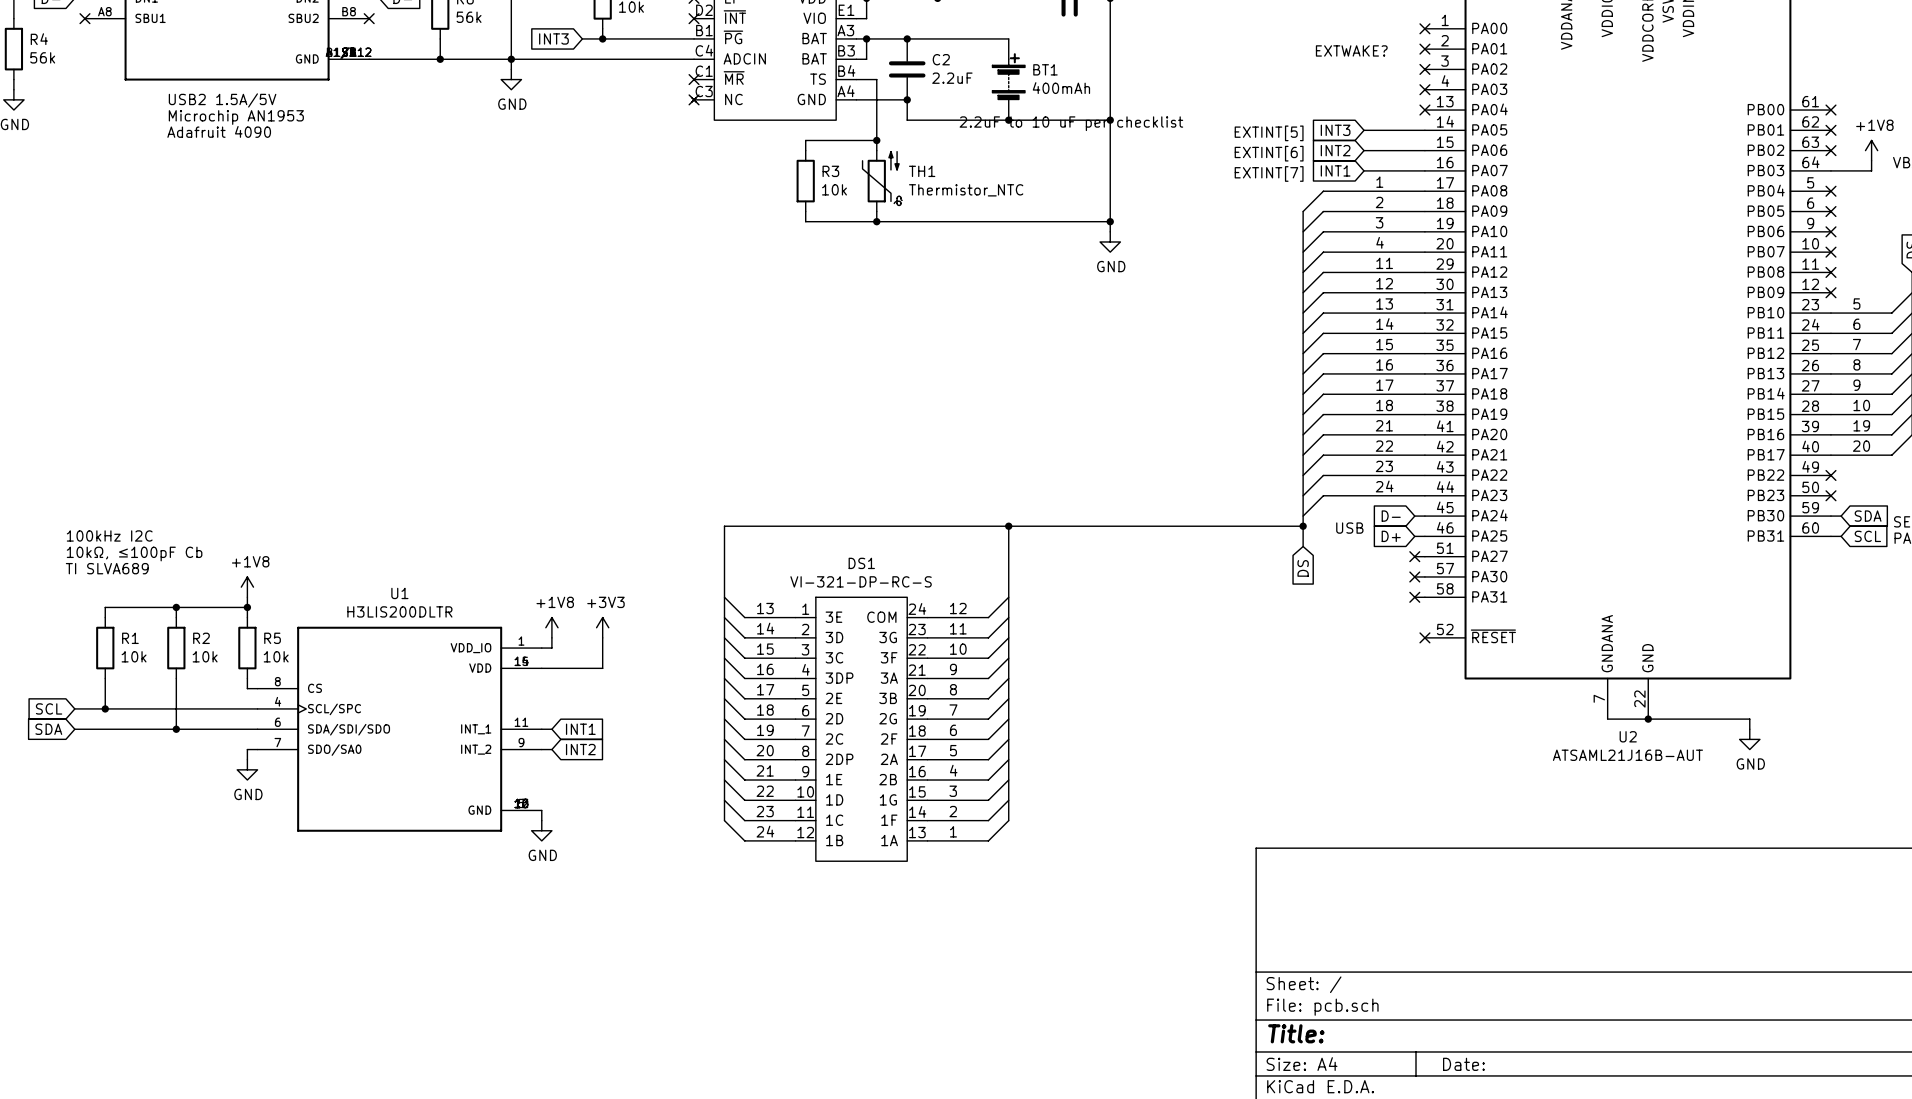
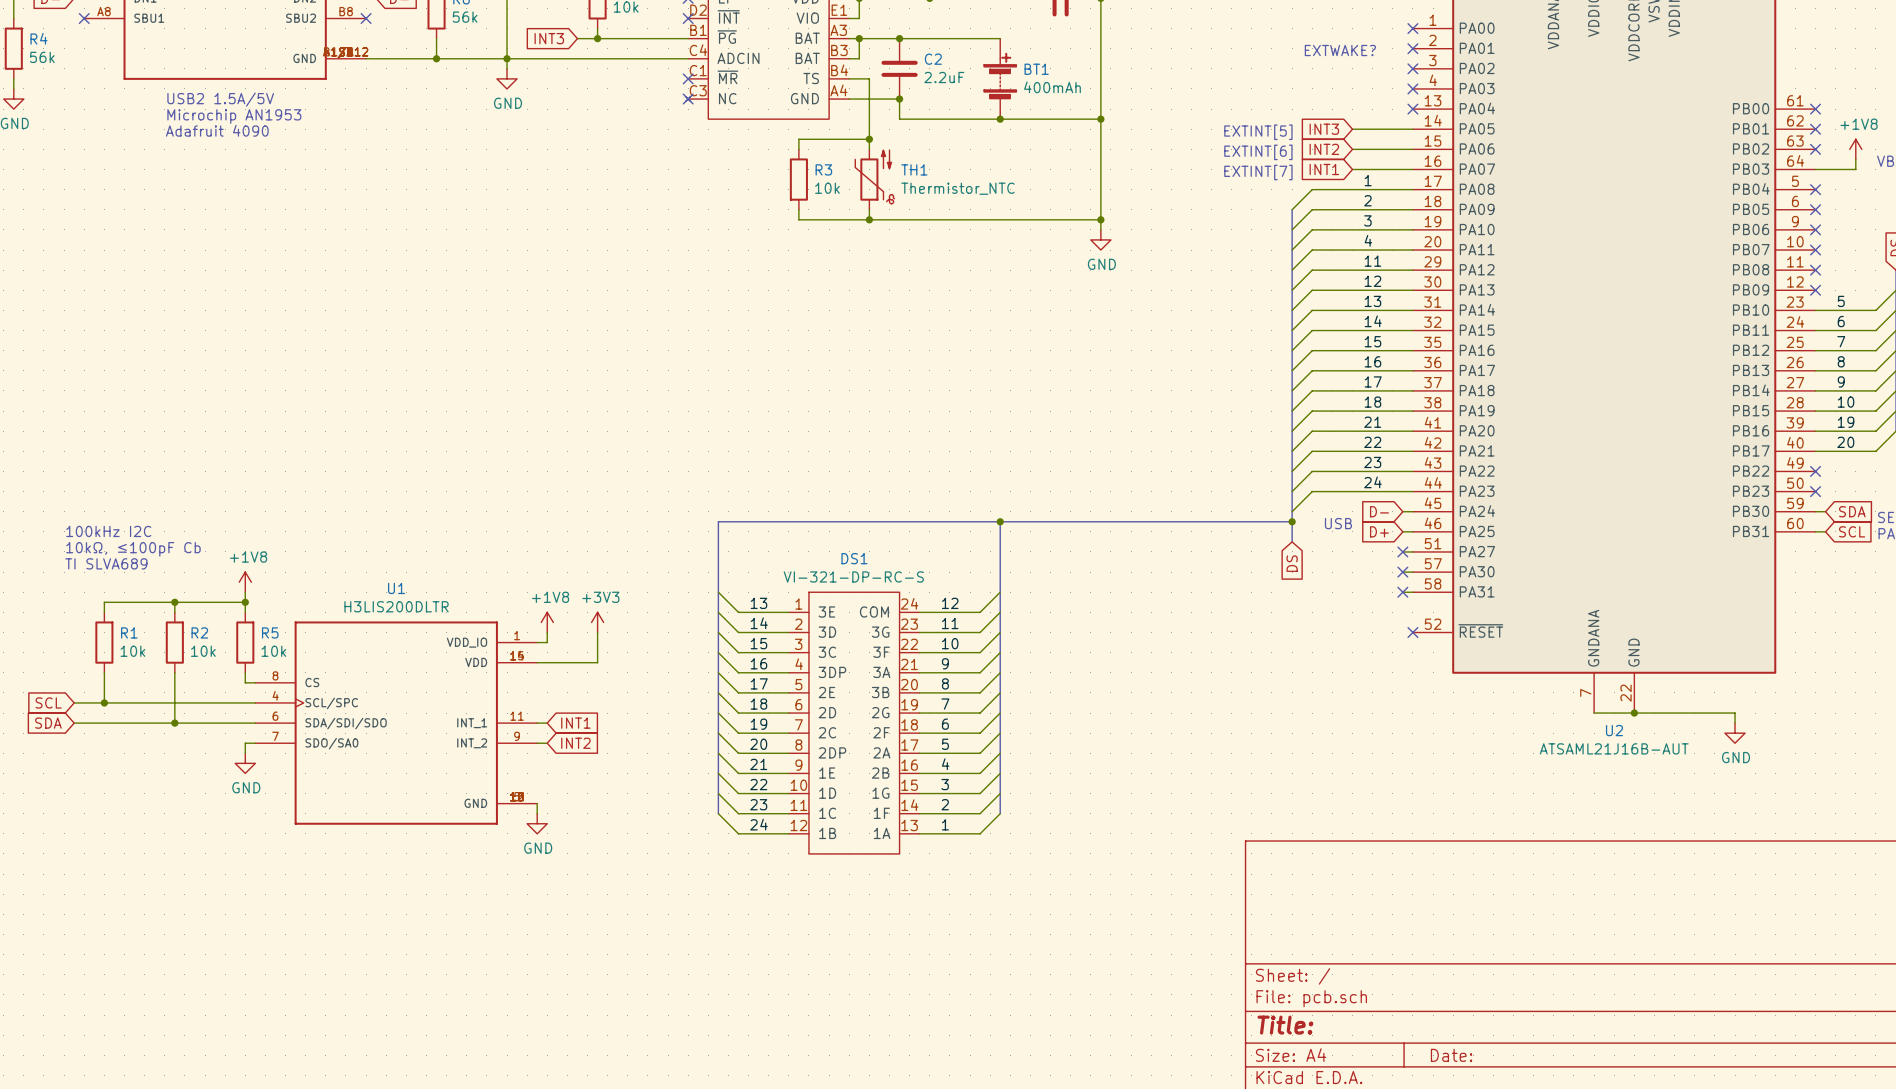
text: 2.2uF to 10 uF per checklist (1071, 123) -> none

